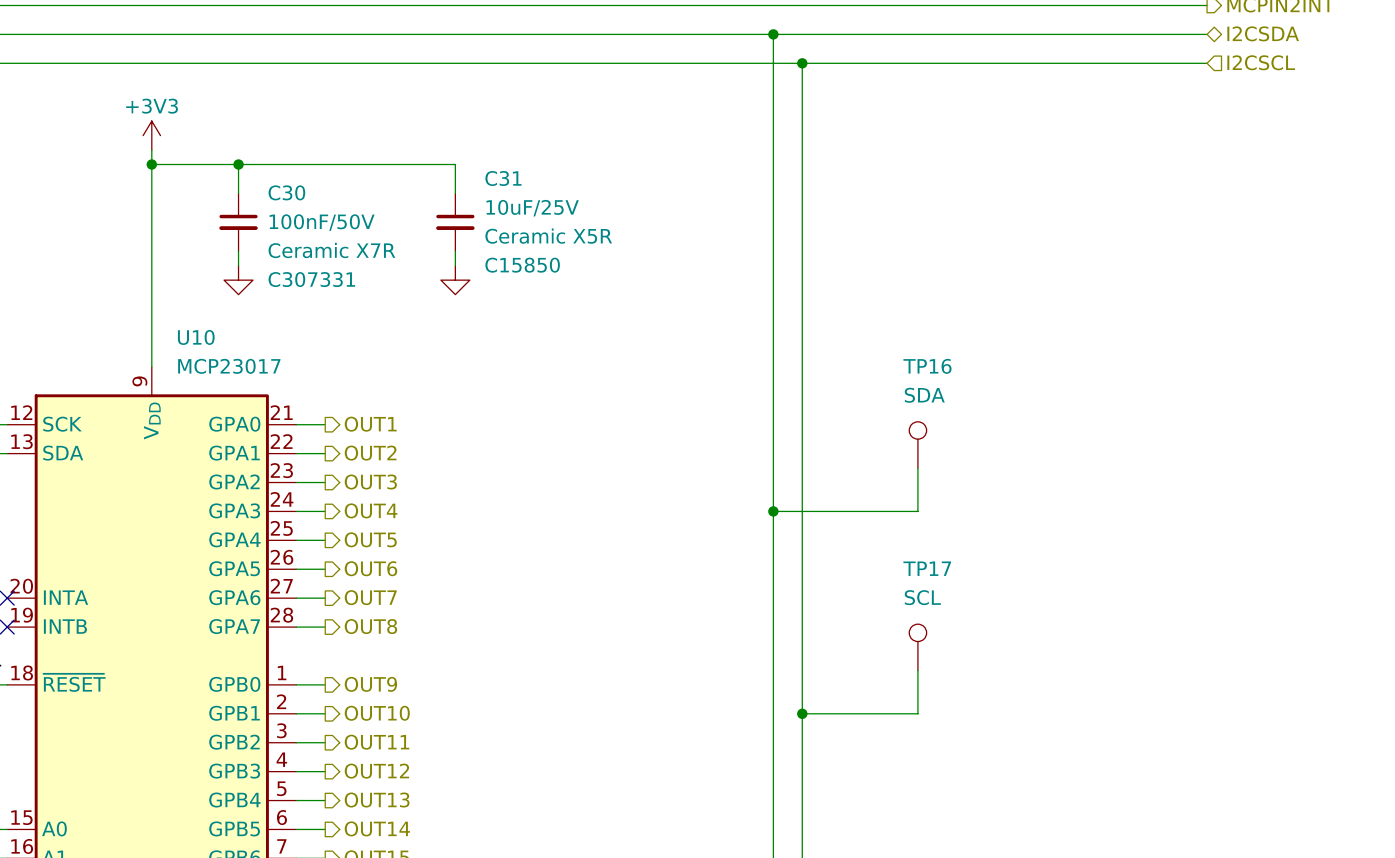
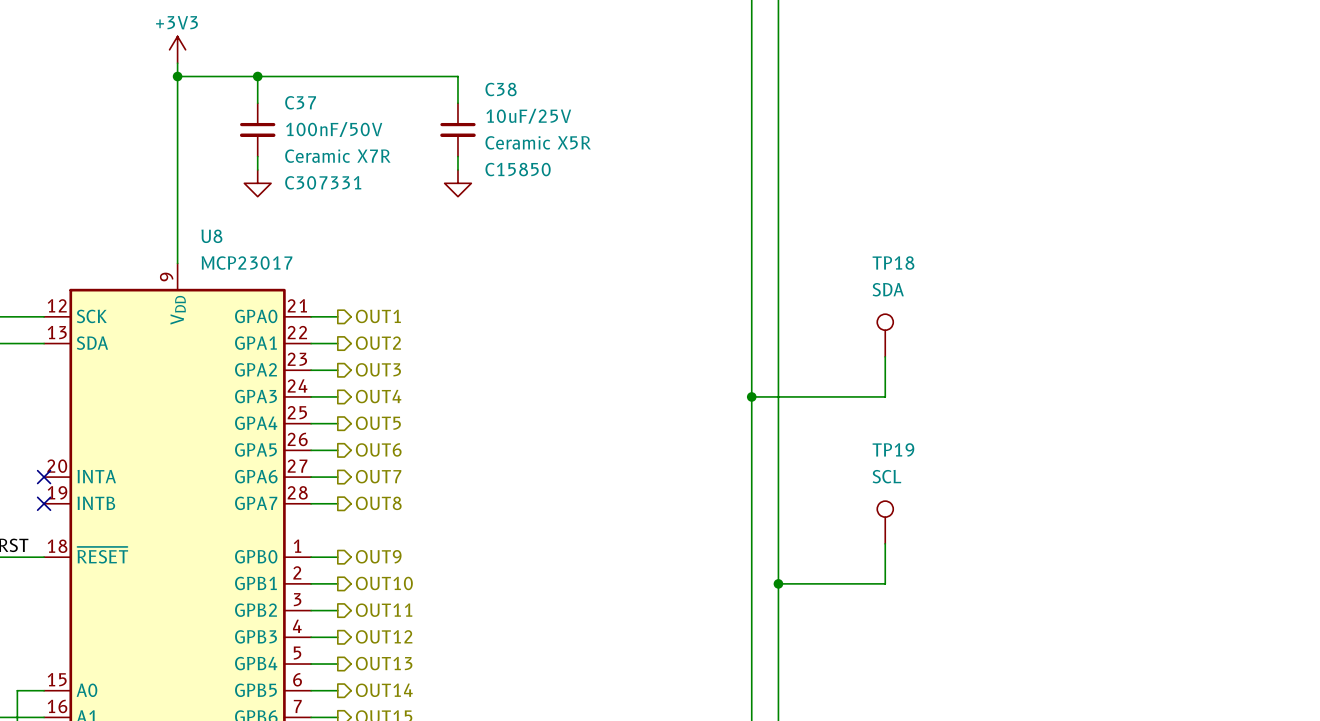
C31 name: C31 (503, 178) -> C38 (501, 89)
C30 name: C30 (286, 192) -> C37 (300, 102)
U10 name: U10 (196, 337) -> U8 (211, 236)
TP16 name: TP16 (927, 366) -> TP18 (893, 263)
TP17 name: TP17 (927, 568) -> TP19 (893, 449)

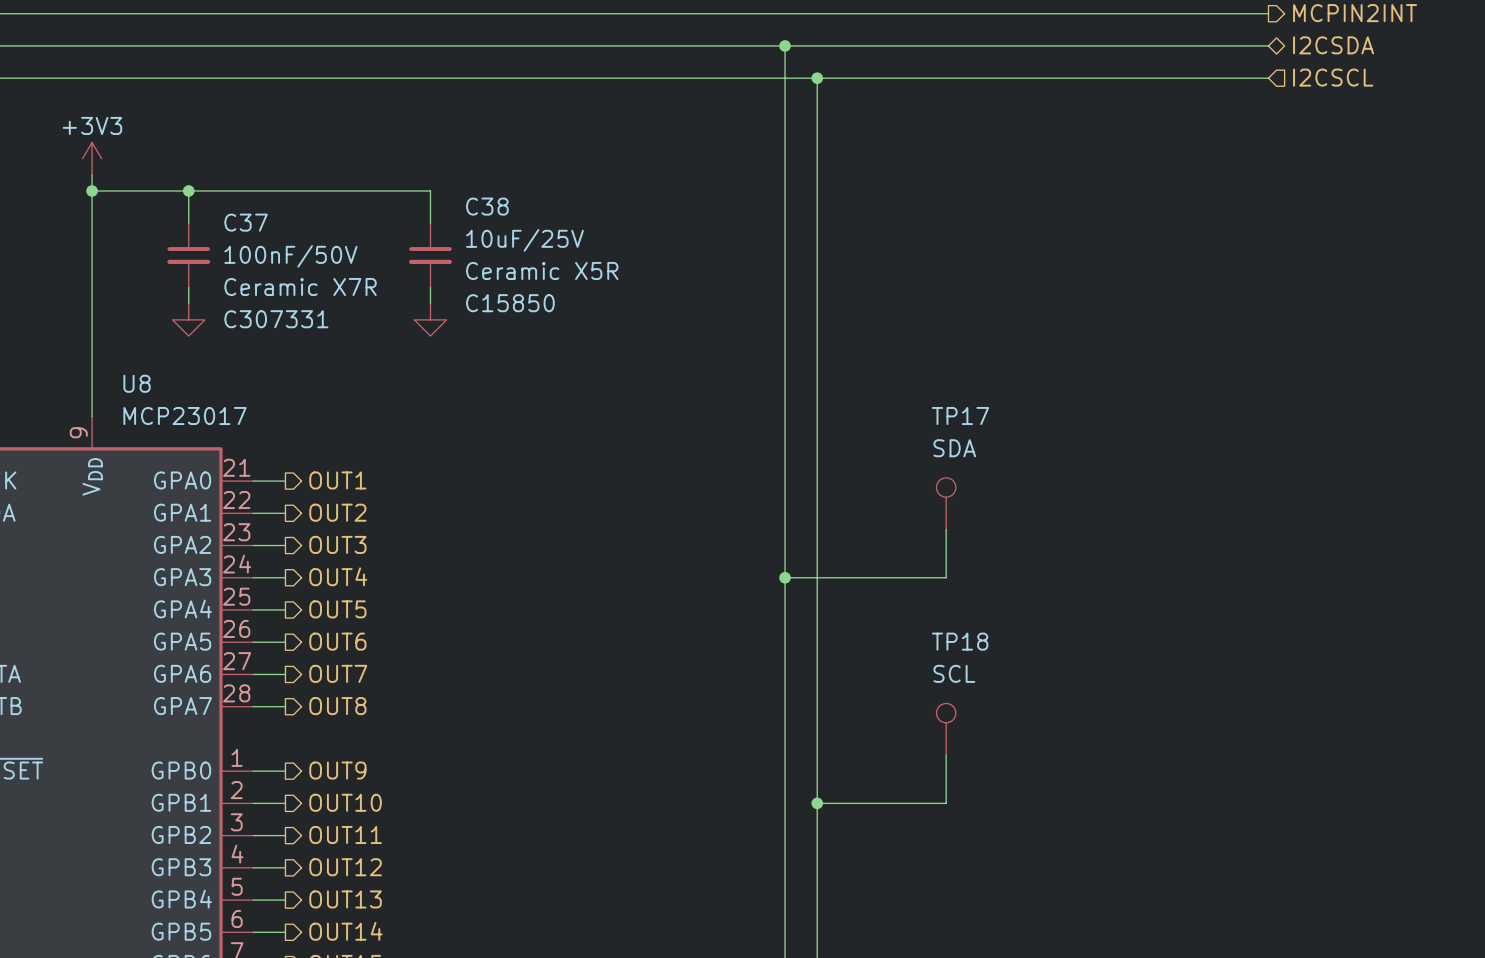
TP18 name: TP18 (893, 263) -> TP17 (960, 416)
TP19 name: TP19 (893, 449) -> TP18 (960, 641)

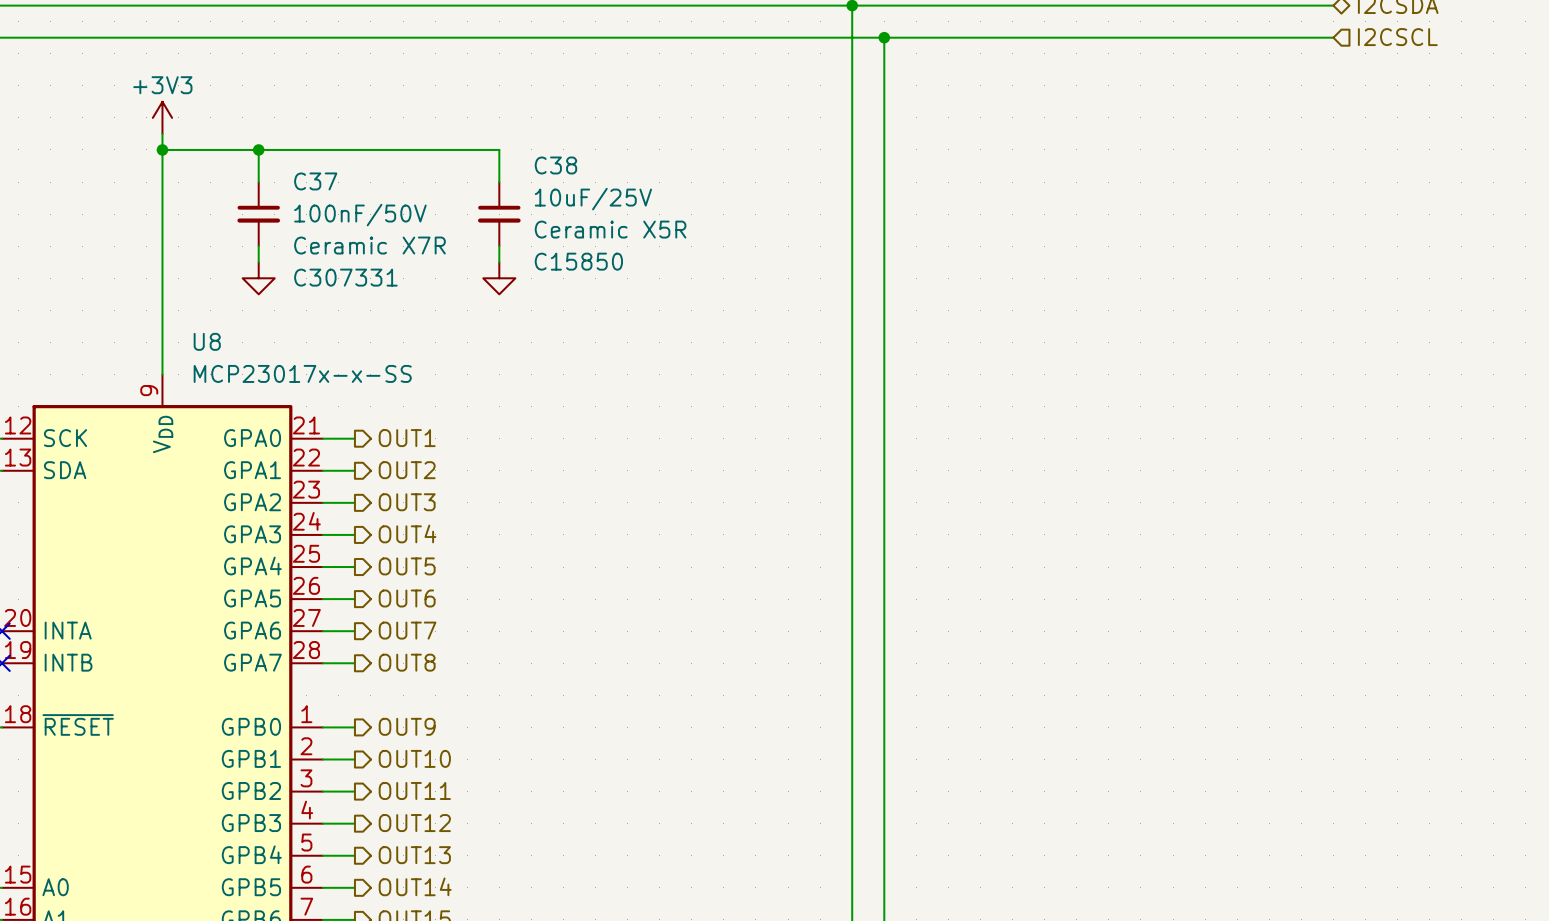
U8 value: MCP23017 (184, 416) -> MCP23017x-x-SS (302, 373)
TP17: SDA (946, 503) -> none
wire: (946, 529) (946, 577) (785, 577) -> none
junction: (785, 577) -> none
TP18: SCL (946, 729) -> none
wire: (946, 755) (946, 803) (817, 803) -> none
junction: (817, 803) -> none

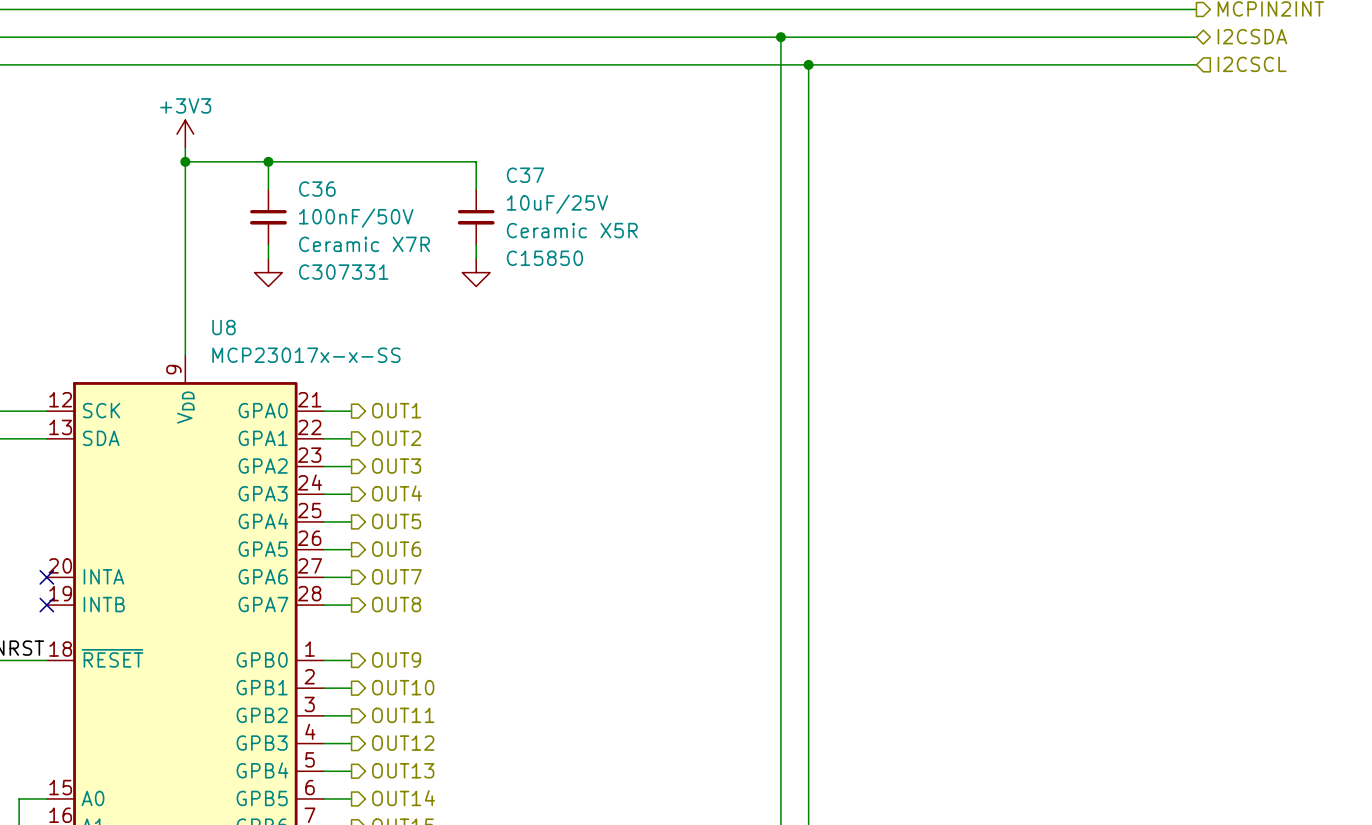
C38 name: C38 (555, 165) -> C37 (525, 175)
C37 name: C37 (315, 181) -> C36 (317, 189)

